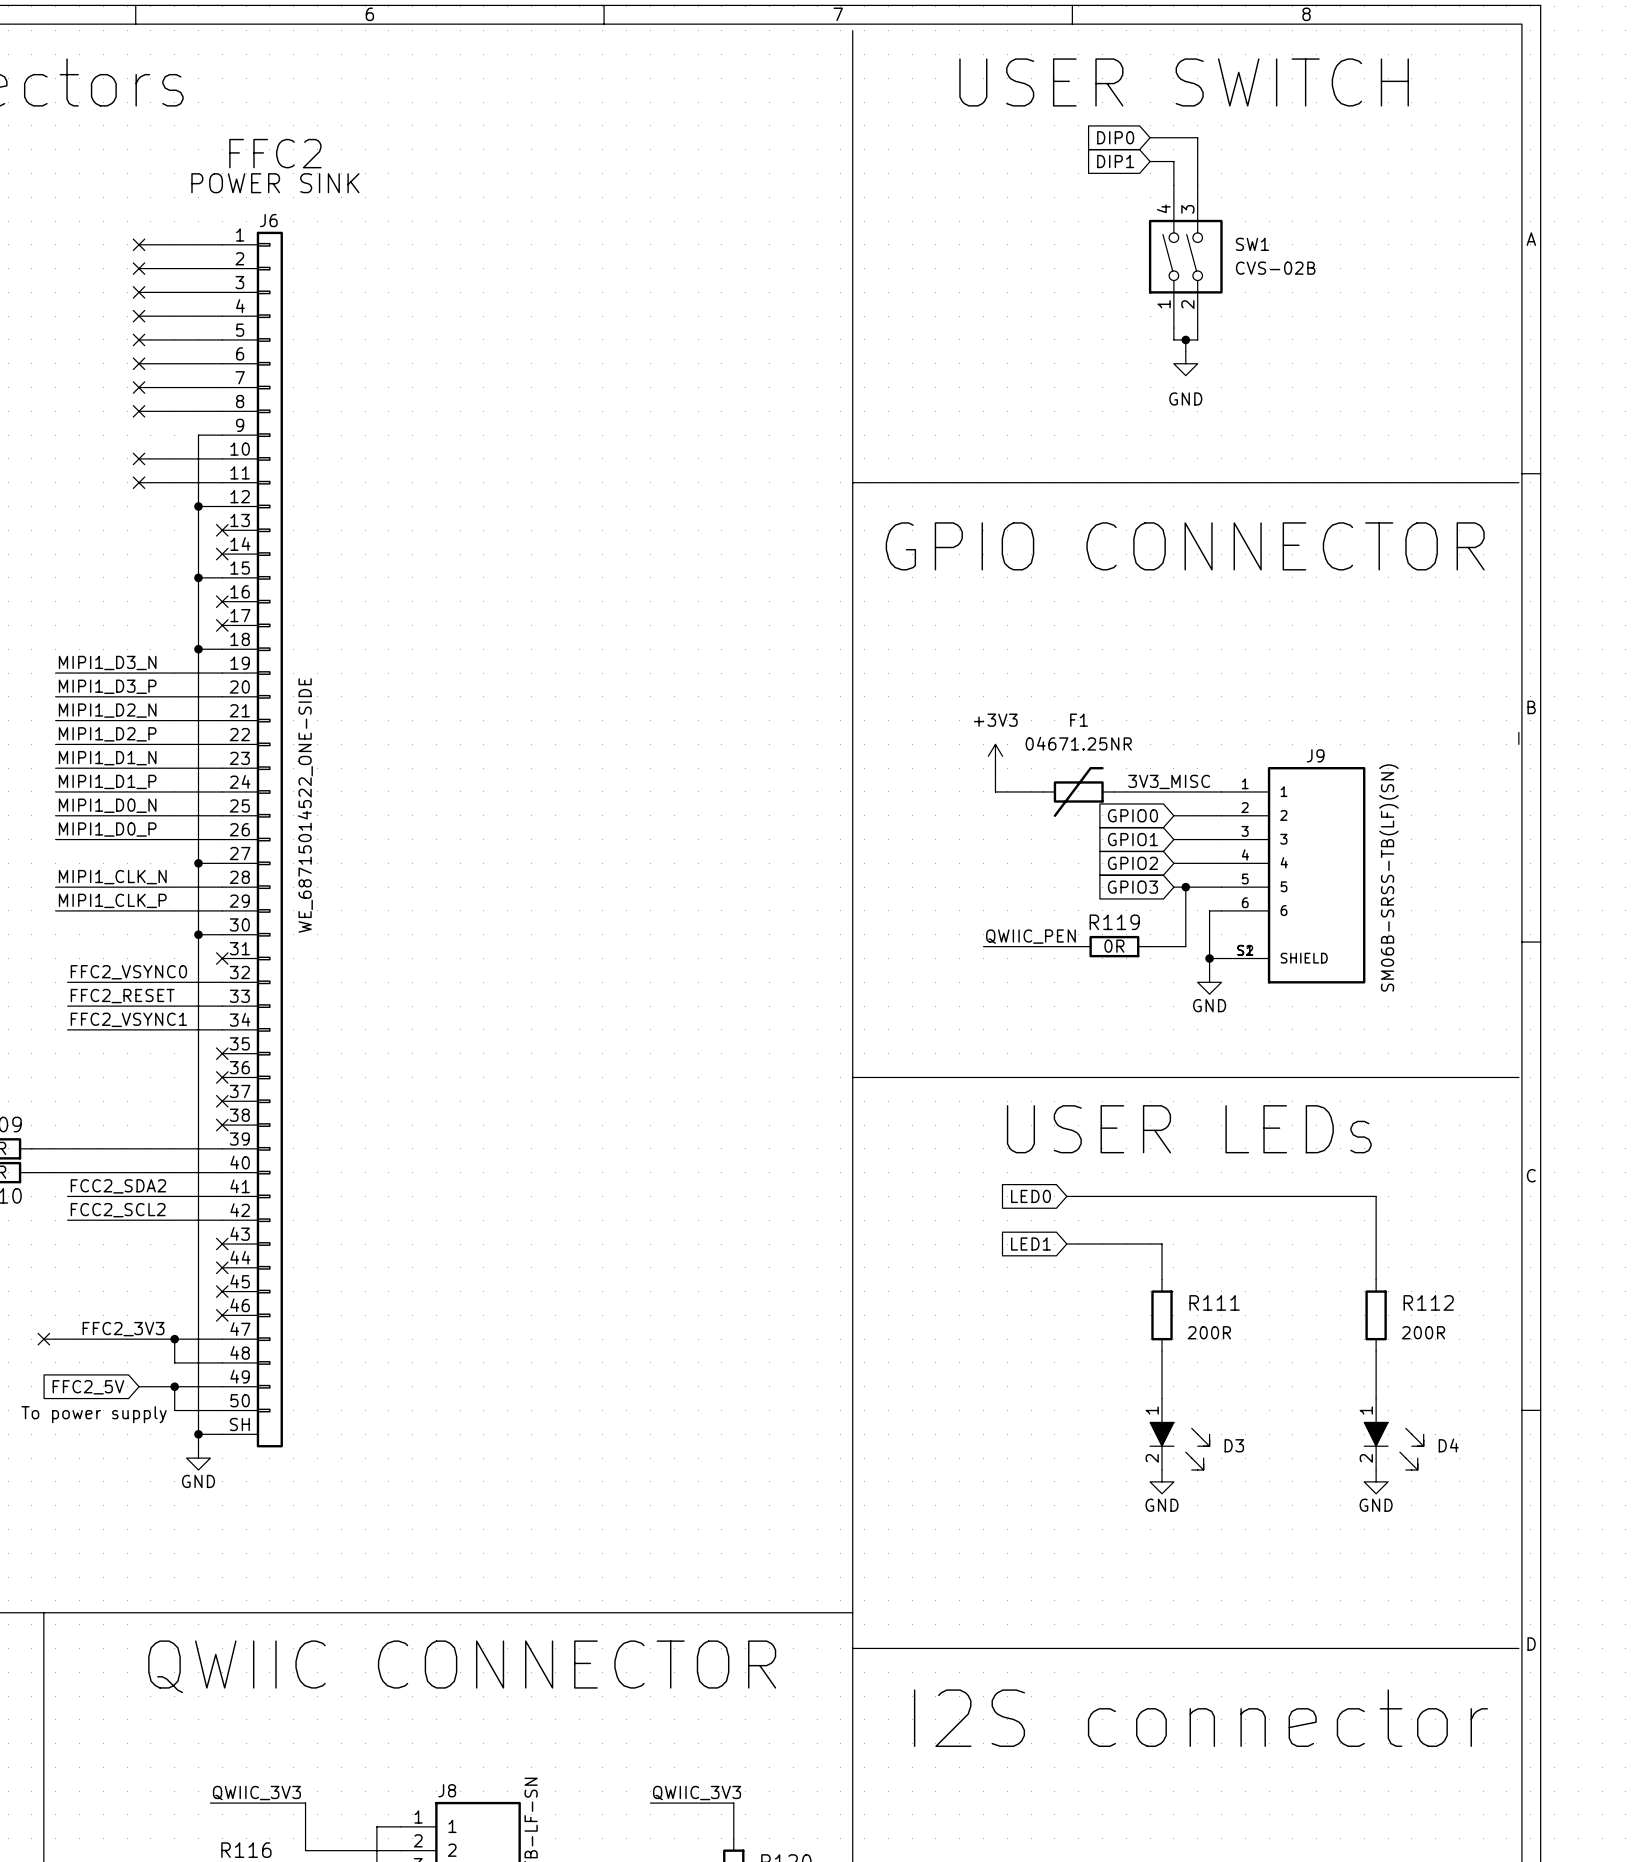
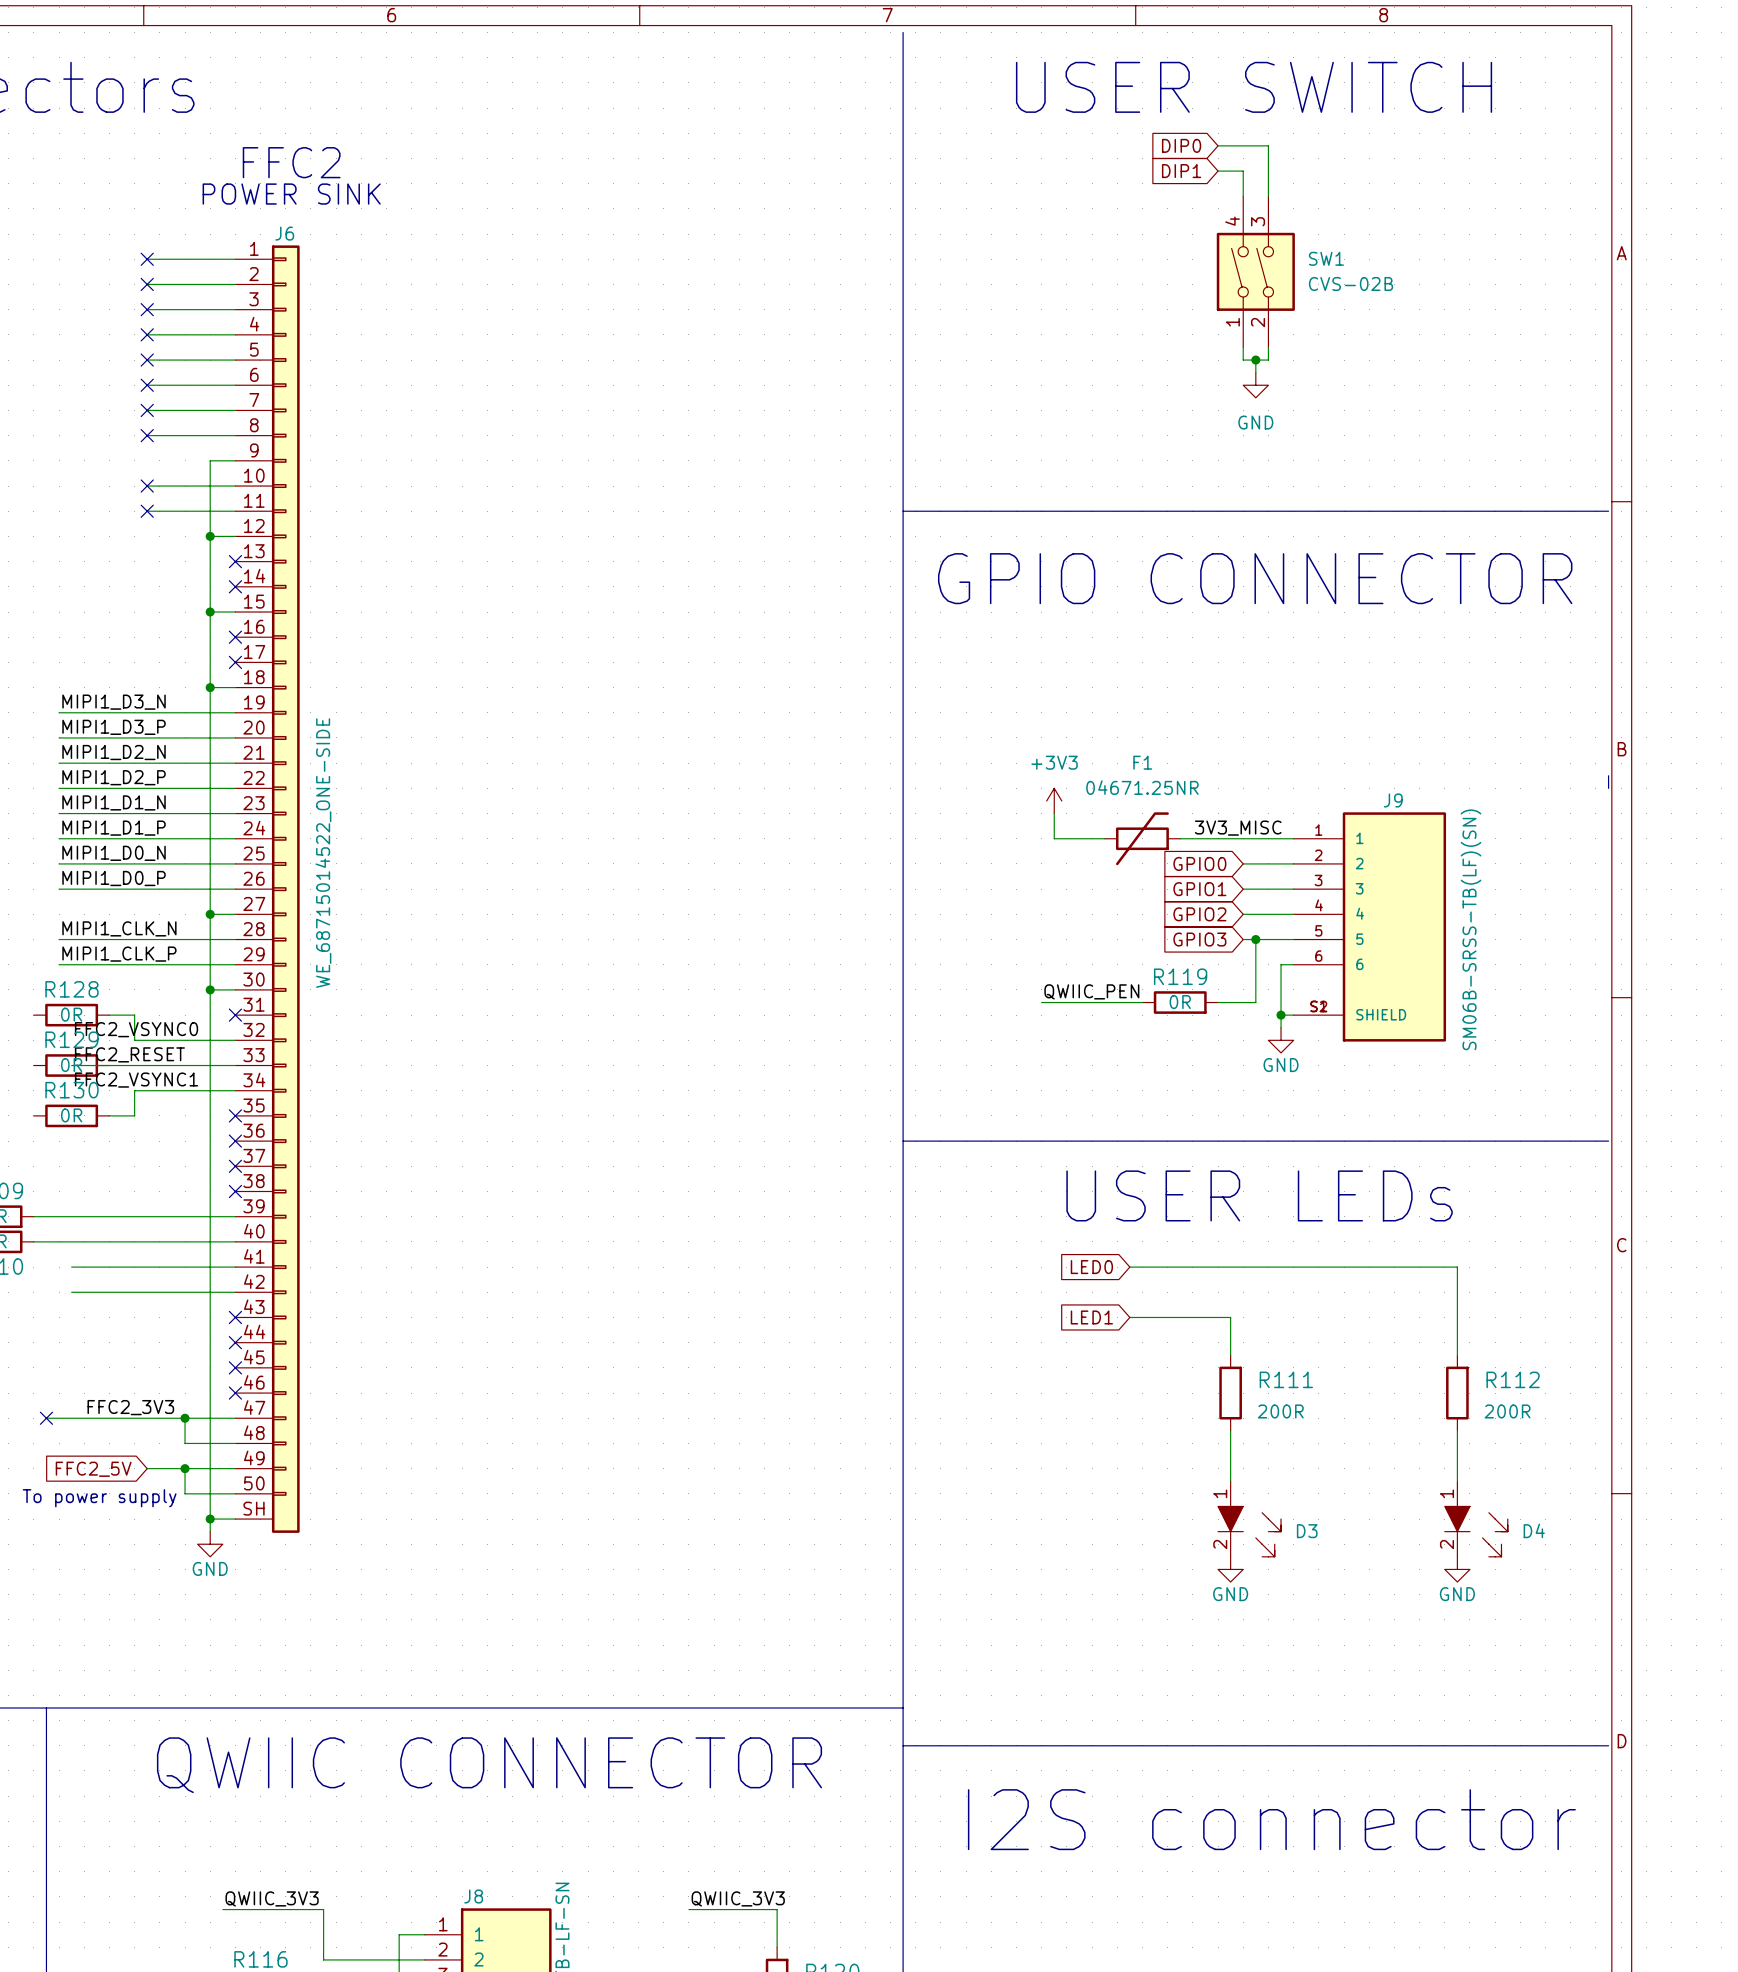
R128: none -> (71, 1015)
wire: (67, 982) (127, 982) -> (109, 1015) (134, 1015) (134, 1040)
R129: none -> (71, 1065)
wire: (67, 1029) (127, 1029) -> (109, 1115) (134, 1115) (134, 1090)
R130: none -> (71, 1115)
label: FCC2_SDA2 (118, 1186) -> none
label: FCC2_SCL2 (118, 1210) -> none

